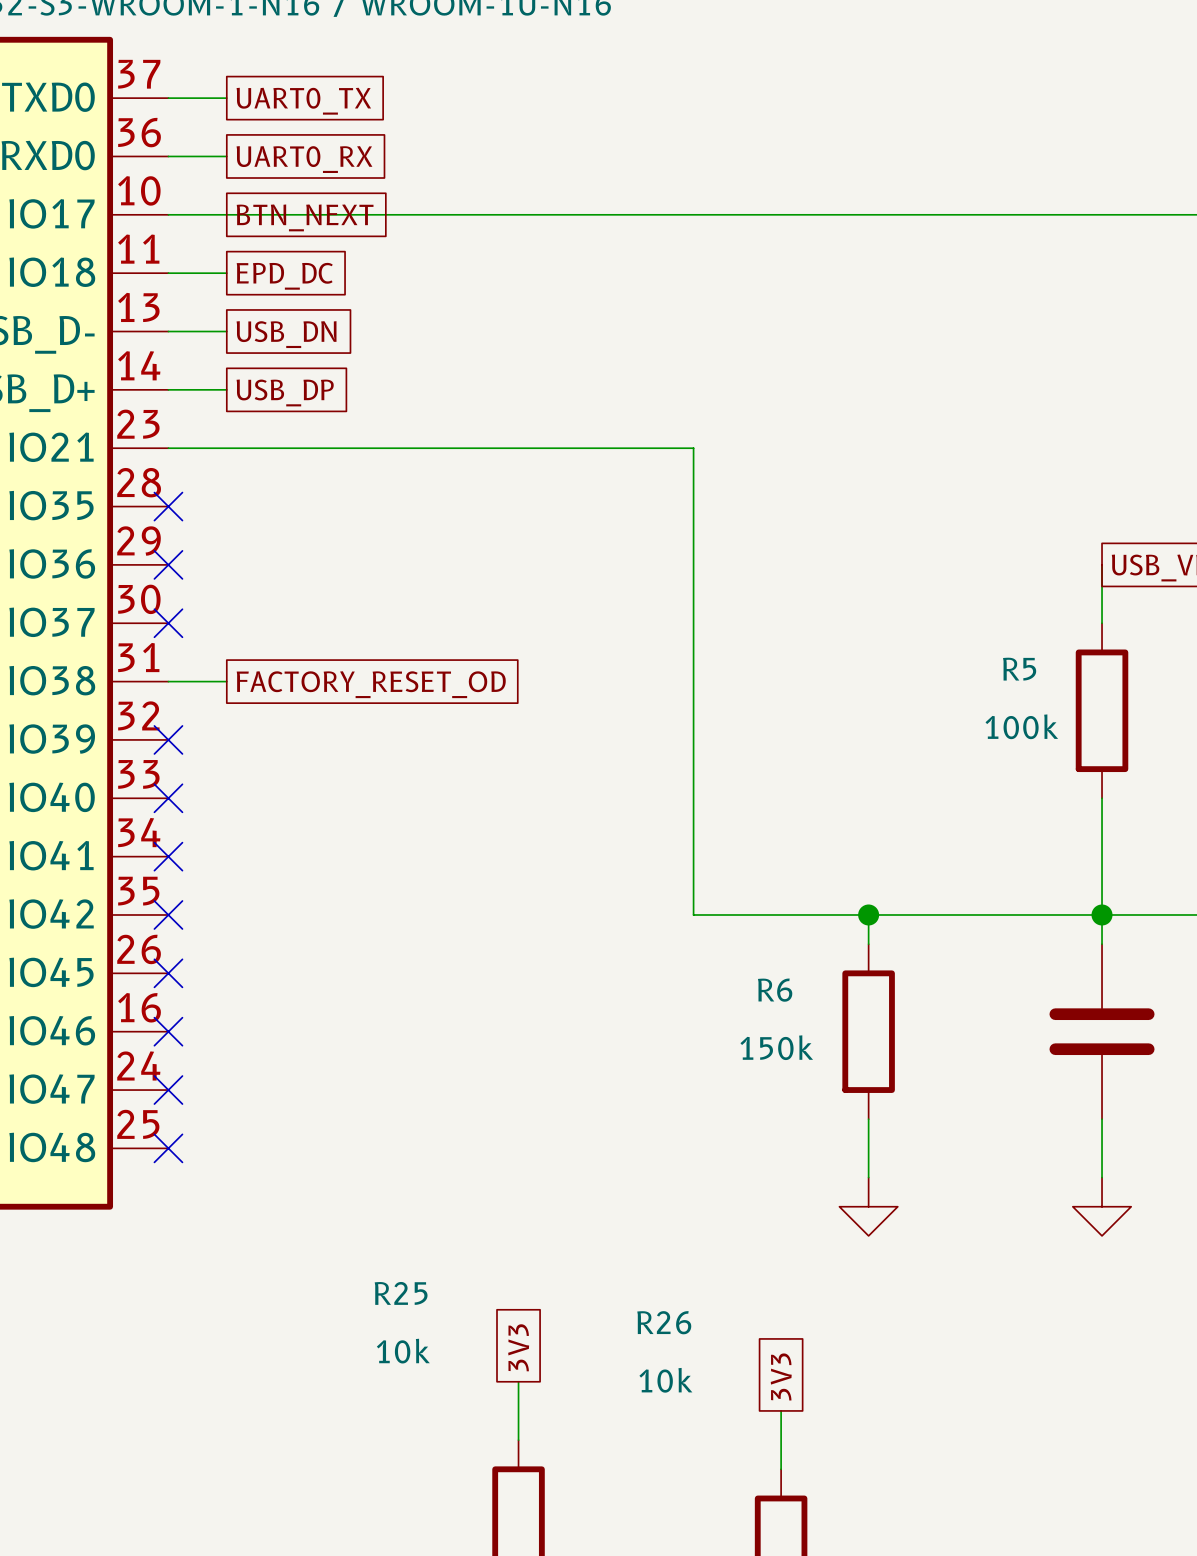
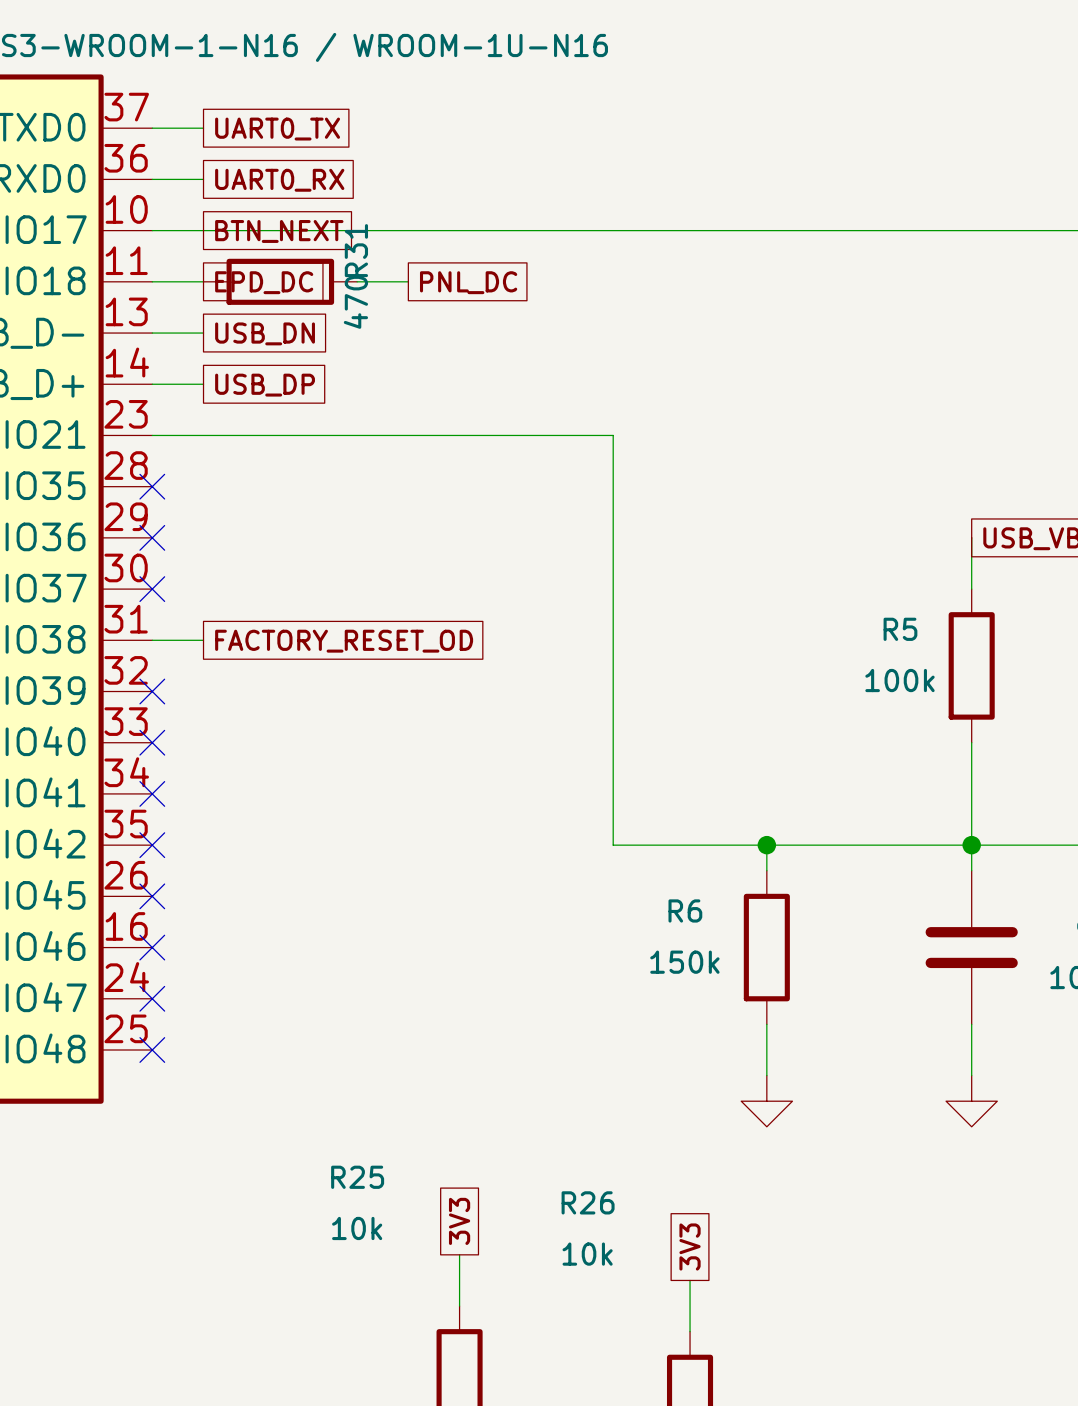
R31: none -> 470 (280, 281)
wire: none -> (357, 281) (408, 281)
global label: none -> PNL_DC (468, 282)

